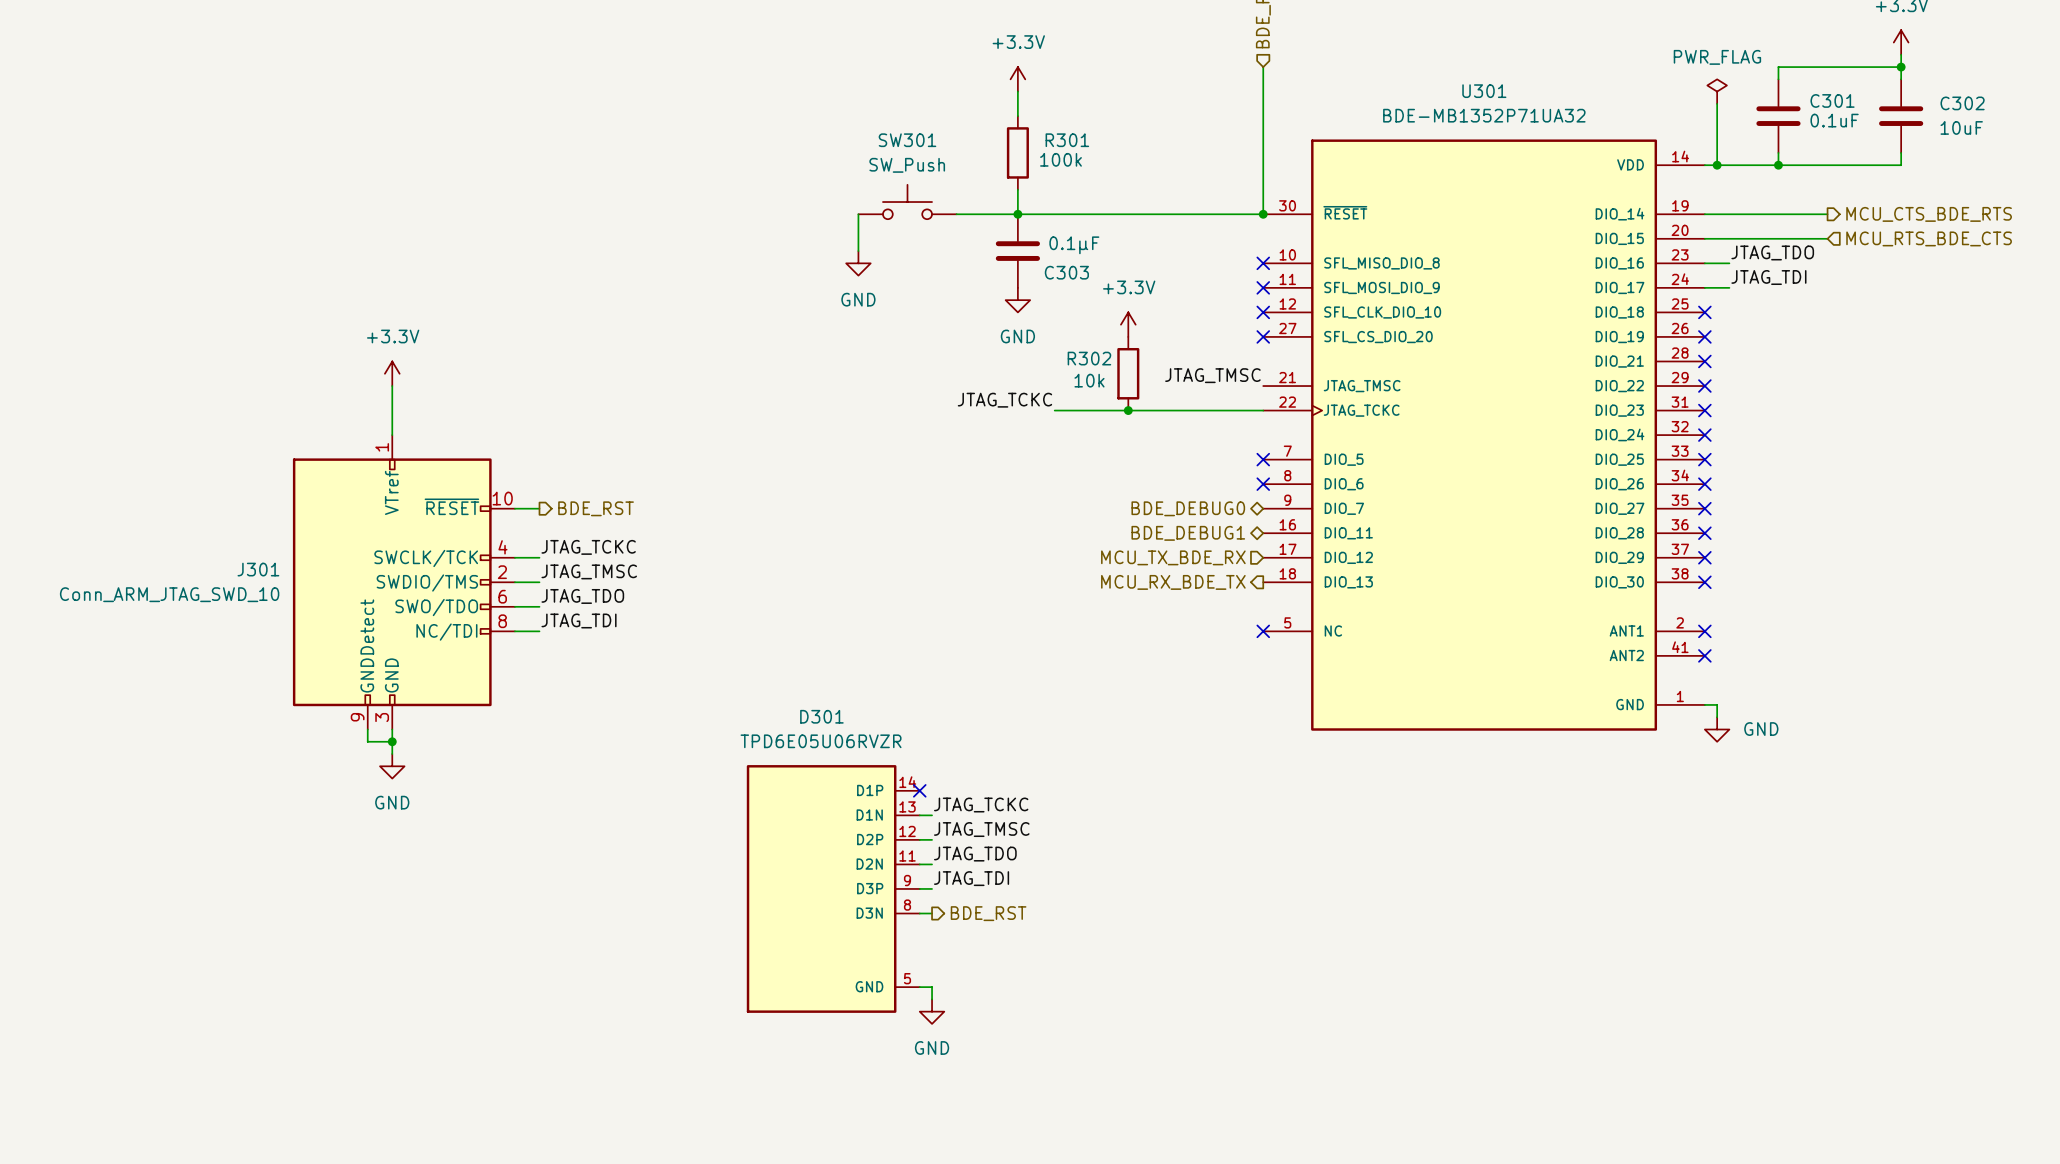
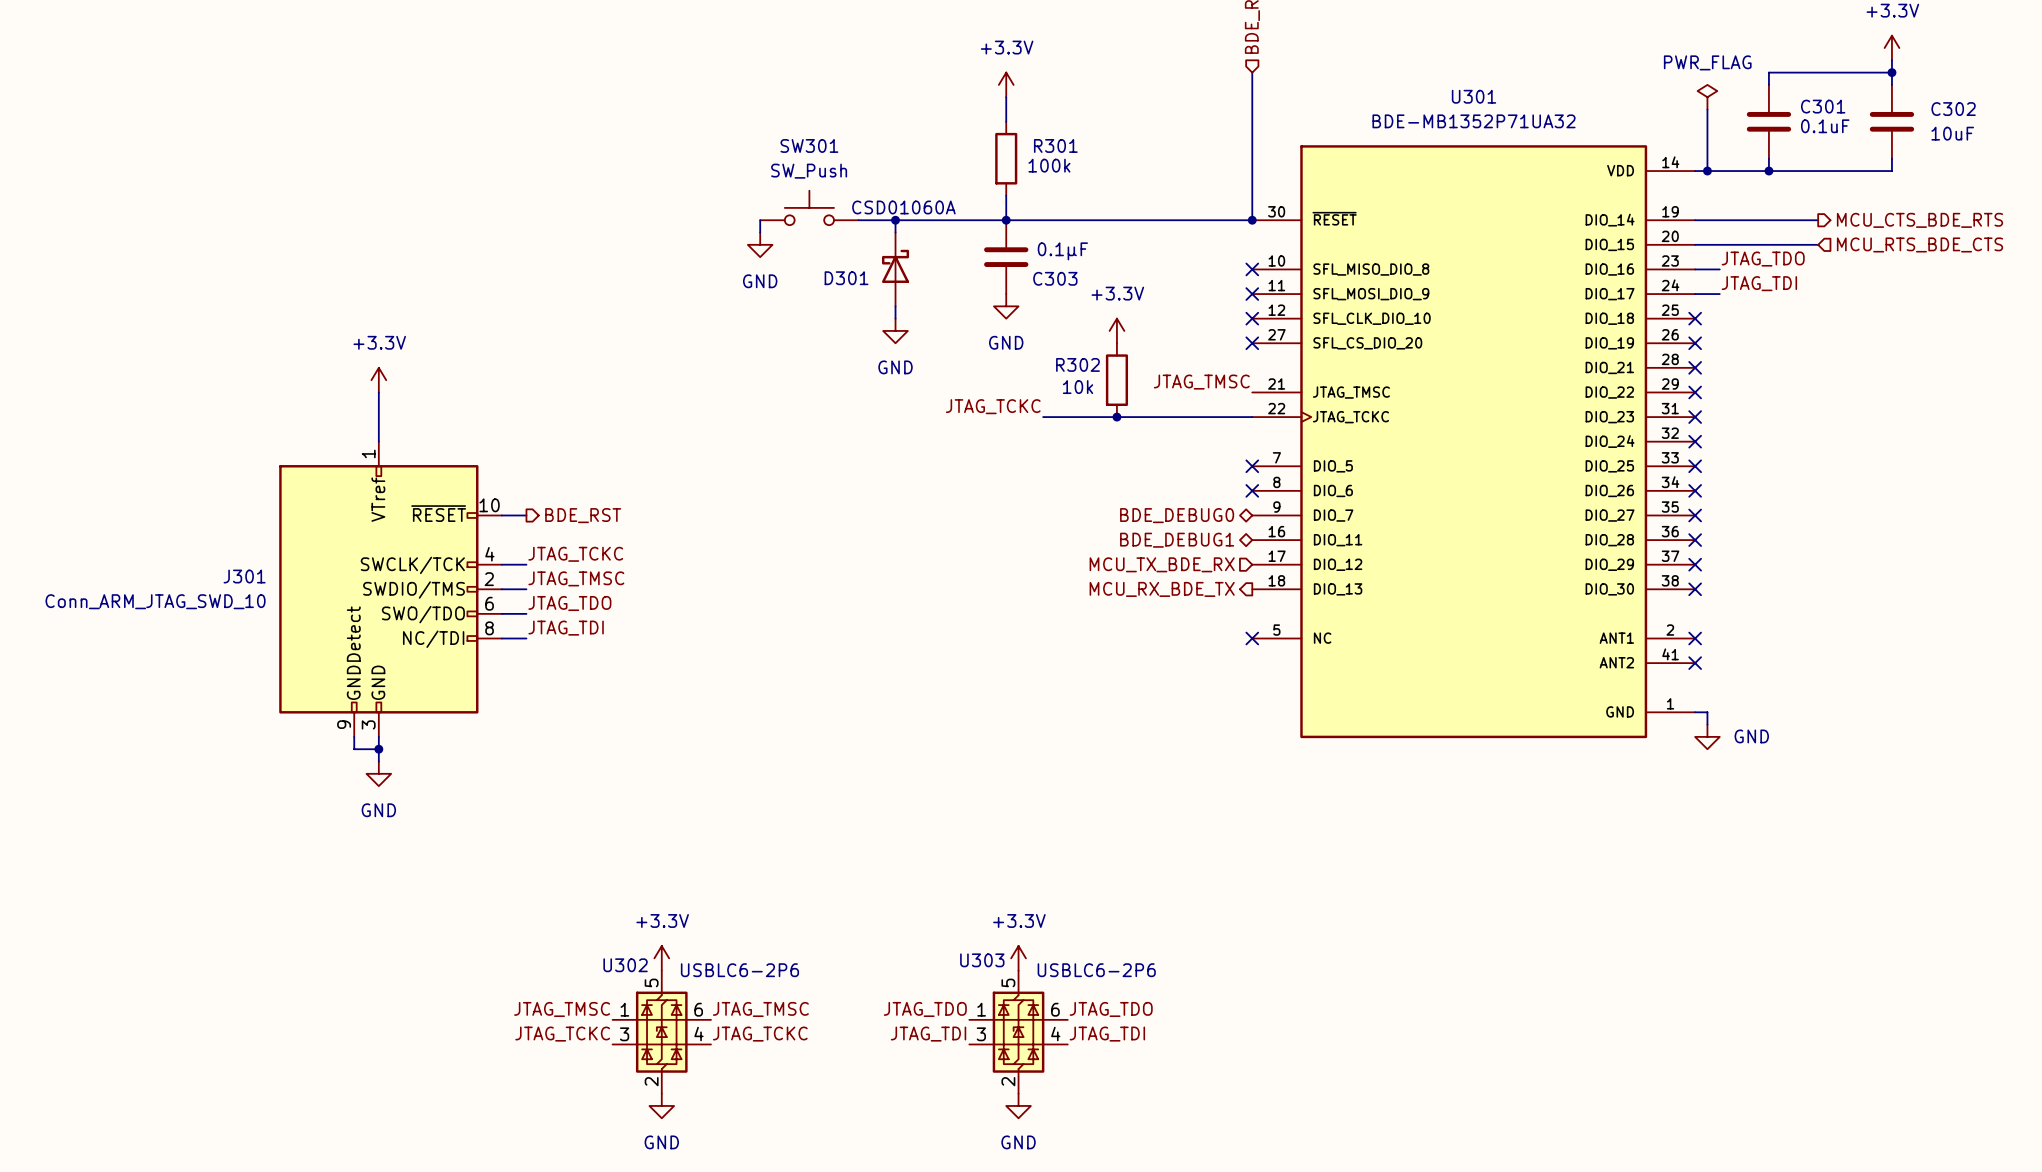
SW301 position: (907, 202) -> (809, 207)
wire: none -> (760, 220) (760, 232)
wire: (858, 214) (858, 251) -> none
wire: none -> (858, 220) (944, 220)
wire: none -> (895, 220) (895, 232)
junction: none -> (895, 220)
power symbol: none -> GND (760, 244)
power symbol: GND (858, 263) -> none
wire: none -> (895, 306) (895, 318)
power symbol: none -> GND (895, 330)
D301 name position: D301 (821, 716) -> D301 (846, 278)
D301 value: TPD6E05U06RVZR (821, 741) -> CSD01060A (903, 207)
D301 symbol: [746, 765, 920, 1013] -> [881, 232, 910, 307]
no-connect mark: (919, 790) -> none
label: JTAG_TCKC (981, 805) -> none
wire: (919, 815) (932, 815) -> none
label: JTAG_TMSC (981, 829) -> none
wire: (919, 839) (932, 839) -> none
label: JTAG_TDO (975, 854) -> none
wire: (919, 864) (932, 864) -> none
label: JTAG_TDI (971, 878) -> none
wire: (919, 888) (932, 888) -> none
wire: (919, 913) (932, 913) -> none
hierarchical label: BDE_RST (988, 913) -> none
power symbol: none -> +3.3V (661, 958)
power symbol: none -> +3.3V (1018, 958)
wire: (919, 987) (932, 987) (932, 999) -> none
label: none -> JTAG_TMSC (562, 1009)
label: none -> JTAG_TMSC (760, 1009)
label: none -> JTAG_TDO (925, 1009)
label: none -> JTAG_TDO (1111, 1009)
power symbol position: GND (932, 1011) -> GND (1018, 1105)
U302: none -> USBLC6-2P6 (661, 1032)
U303: none -> USBLC6-2P6 (1018, 1032)
label: none -> JTAG_TCKC (562, 1034)
label: none -> JTAG_TCKC (760, 1034)
label: none -> JTAG_TDI (928, 1034)
label: none -> JTAG_TDI (1107, 1034)
power symbol: none -> GND (661, 1105)

